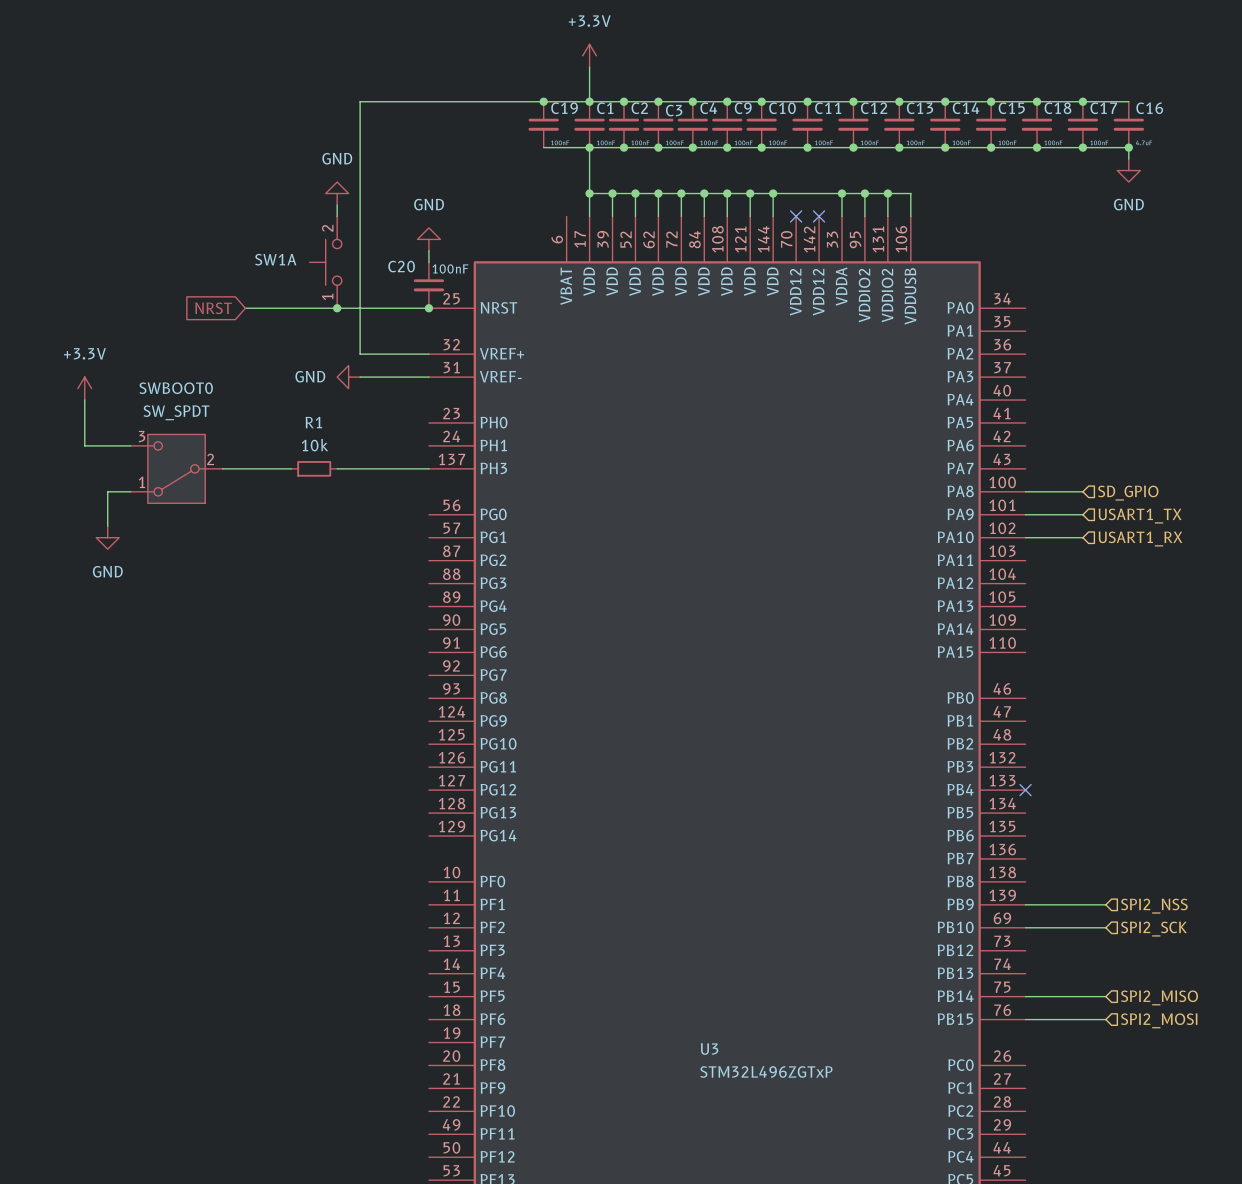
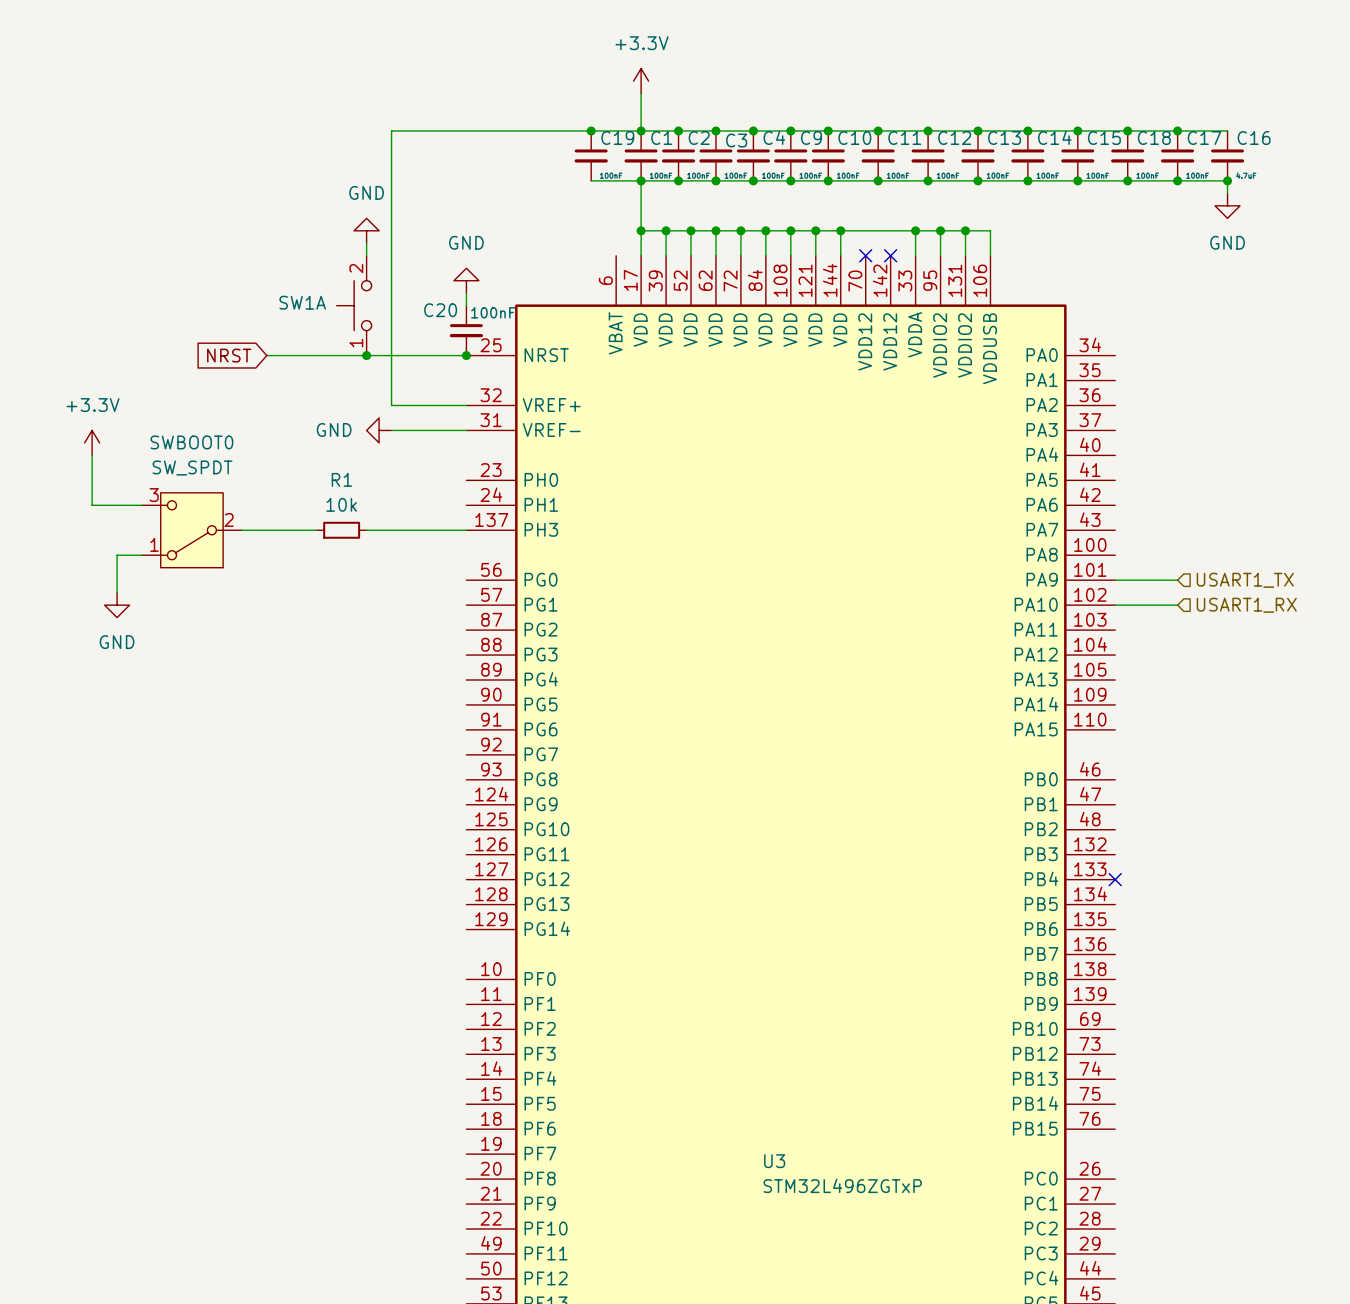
wire: (1025, 491) (1082, 491) -> none
hierarchical label: SD_GPIO (1128, 493) -> none
wire: (1025, 904) (1105, 904) -> none
hierarchical label: SPI2_NSS (1154, 906) -> none
wire: (1025, 927) (1105, 927) -> none
hierarchical label: SPI2_SCK (1153, 929) -> none
wire: (1025, 996) (1105, 996) -> none
hierarchical label: SPI2_MISO (1159, 997) -> none
wire: (1025, 1019) (1105, 1019) -> none
hierarchical label: SPI2_MOSI (1159, 1020) -> none

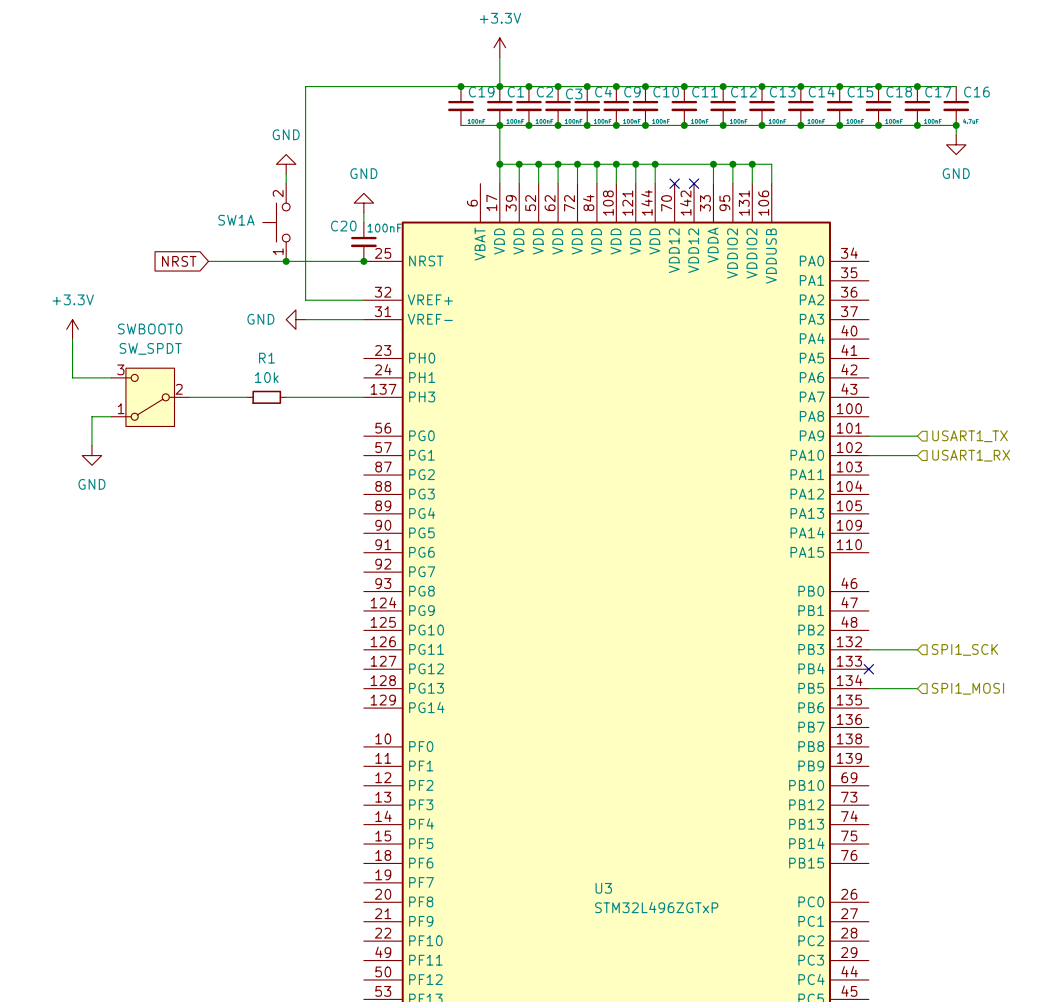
wire: none -> (868, 649) (917, 649)
hierarchical label: none -> SPI1_SCK (964, 649)
wire: none -> (868, 688) (917, 688)
hierarchical label: none -> SPI1_MOSI (967, 688)

